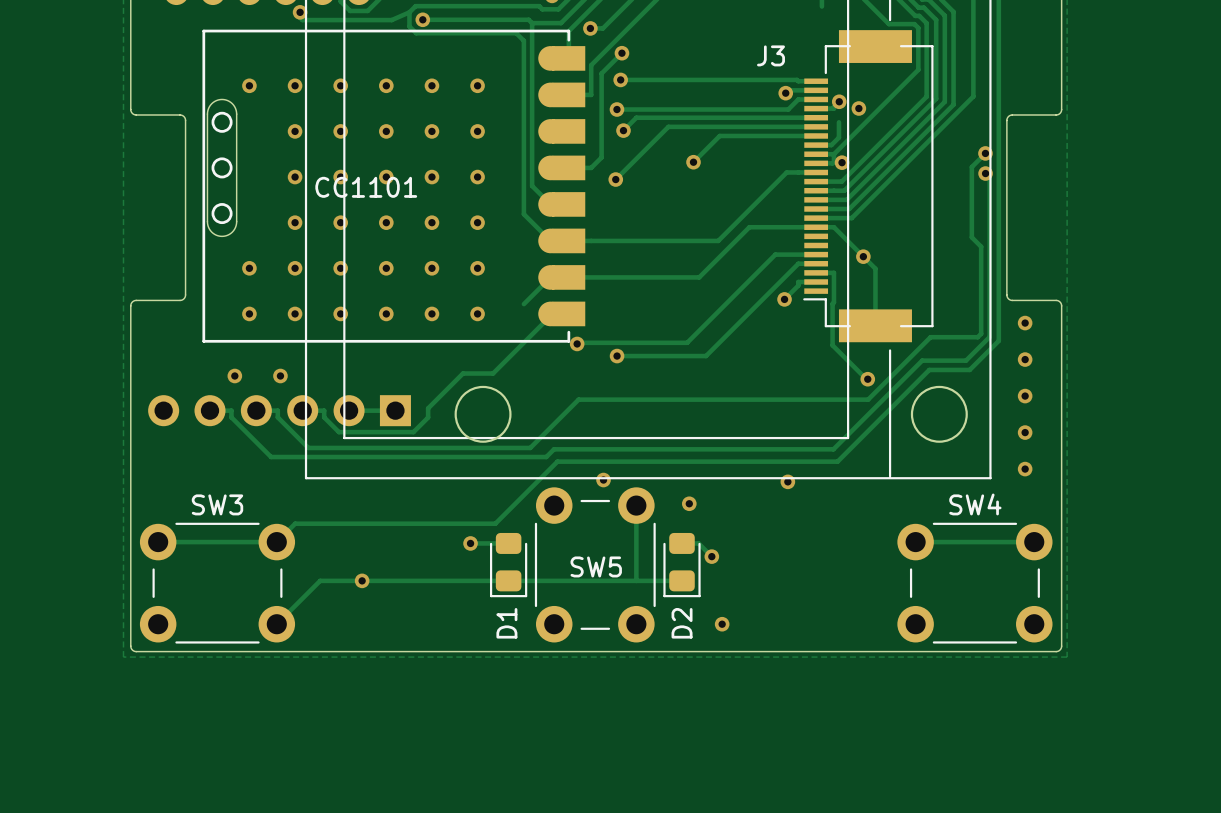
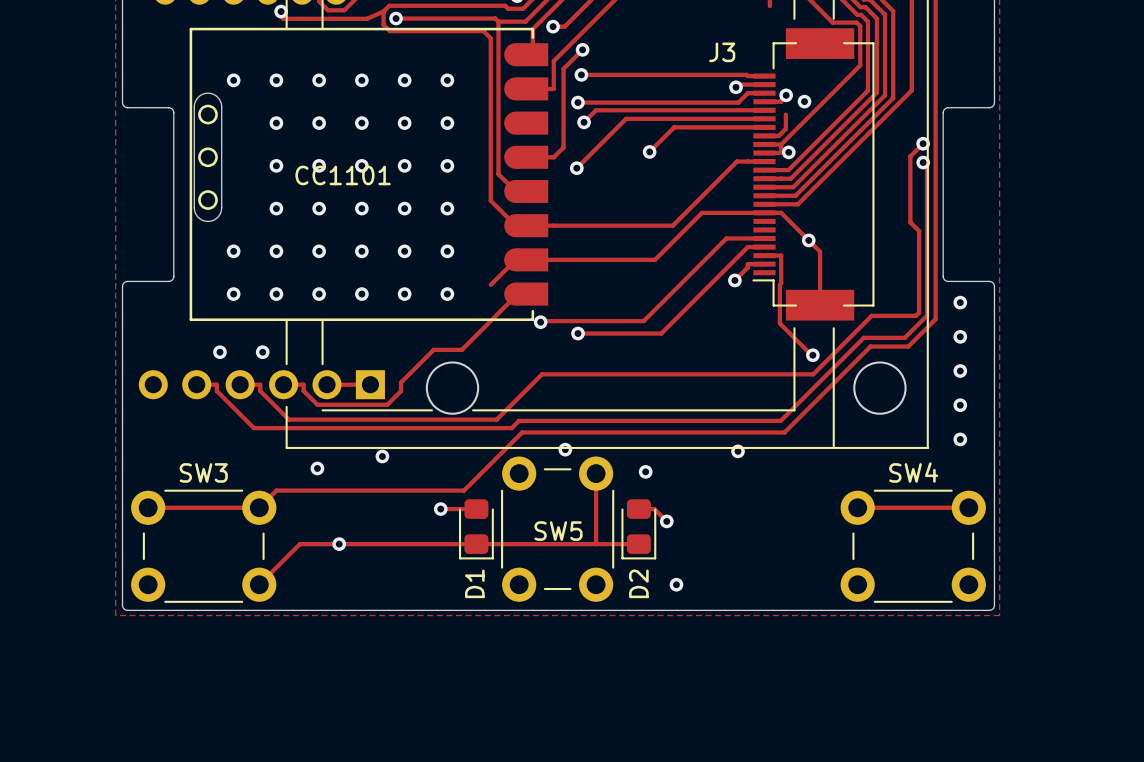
line: (848, 20) (848, 350) -> none
line: (306, 31) (306, 341) -> none
line: (344, 31) (344, 341) -> none
line: (306, 388) (306, 434) -> none
line: (344, 388) (344, 438) -> none
line: (461, 438) (504, 438) -> none
via: none -> (382, 456)
via: none -> (317, 468)

